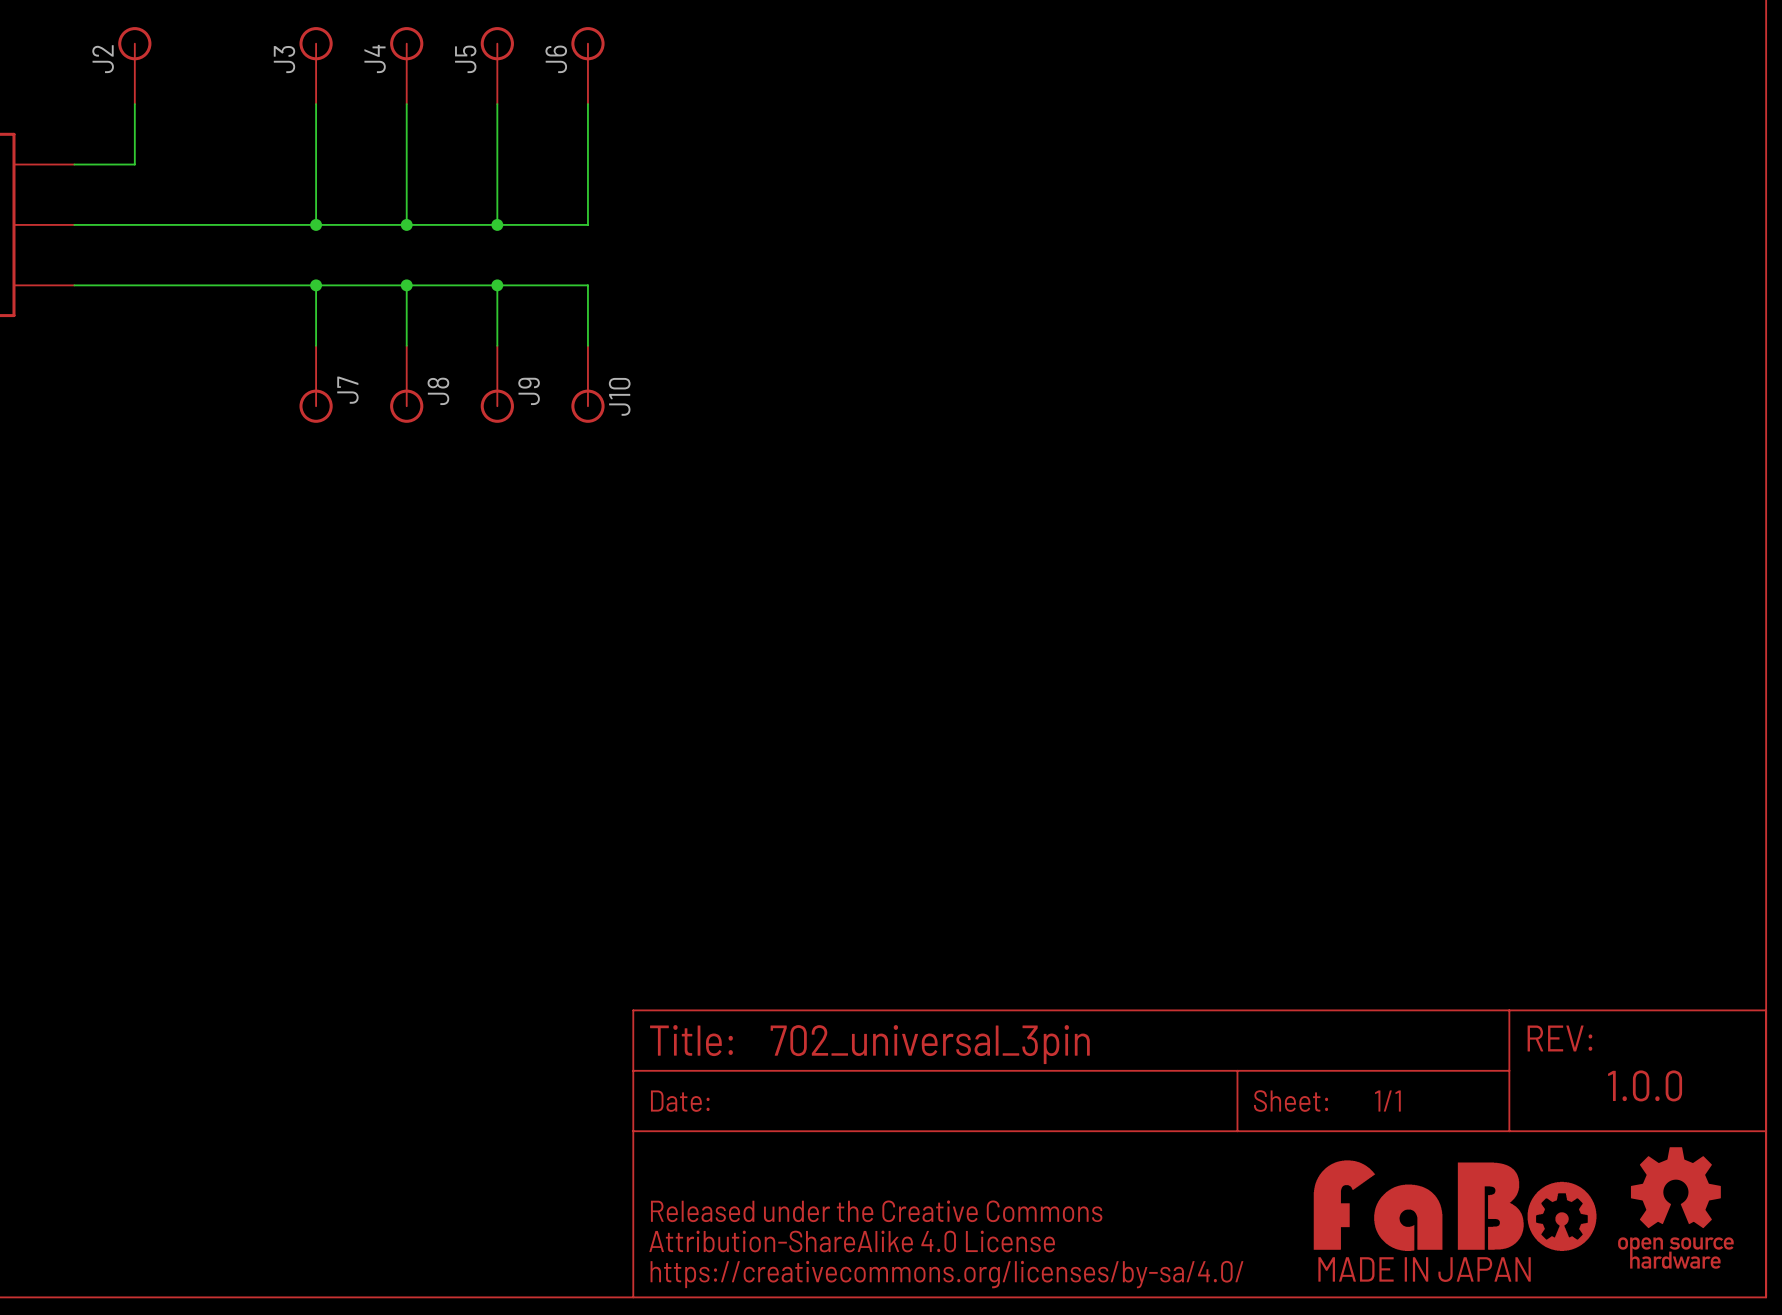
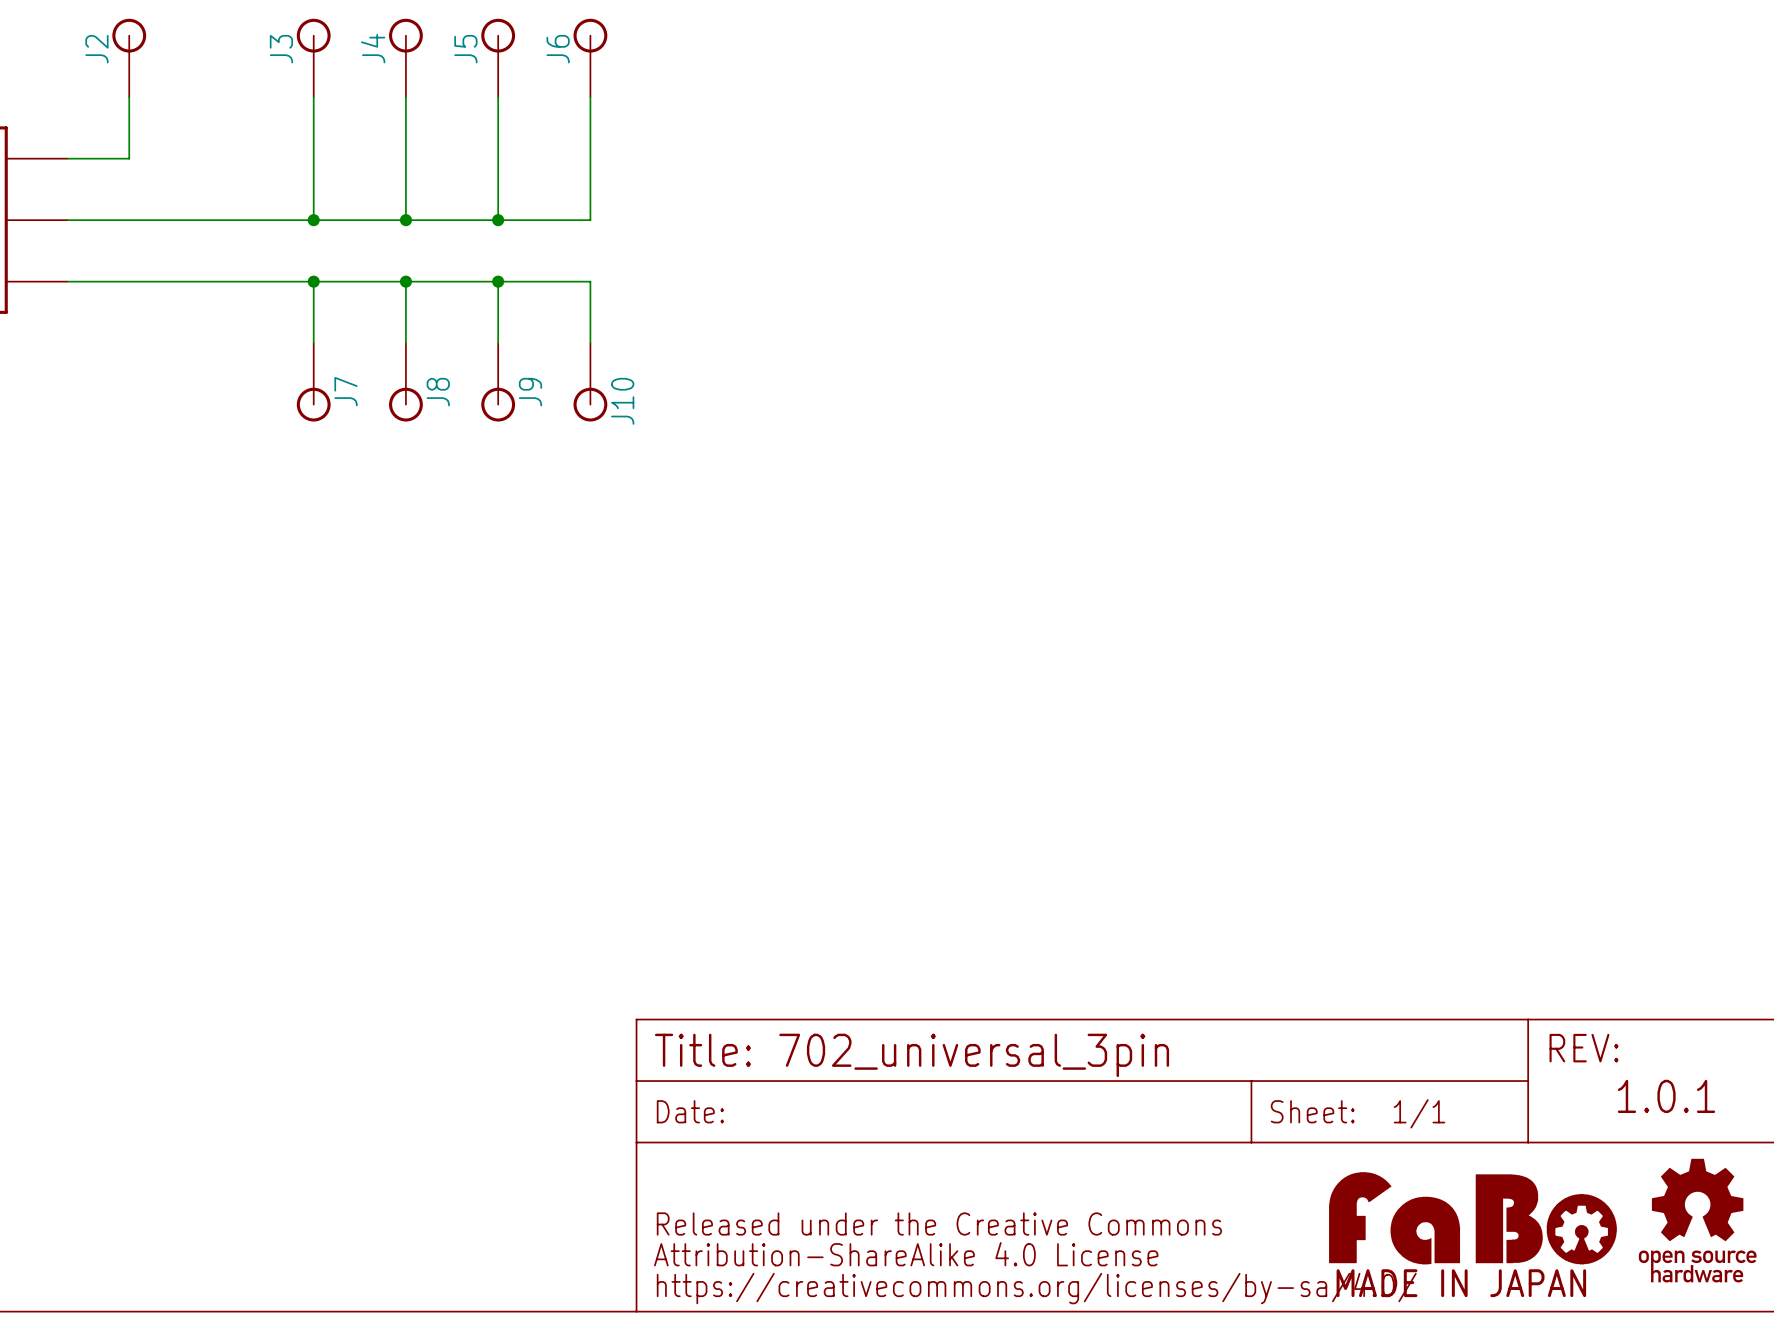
text: 1.0.0 (1645, 1085) -> 1.0.1 (1666, 1096)

